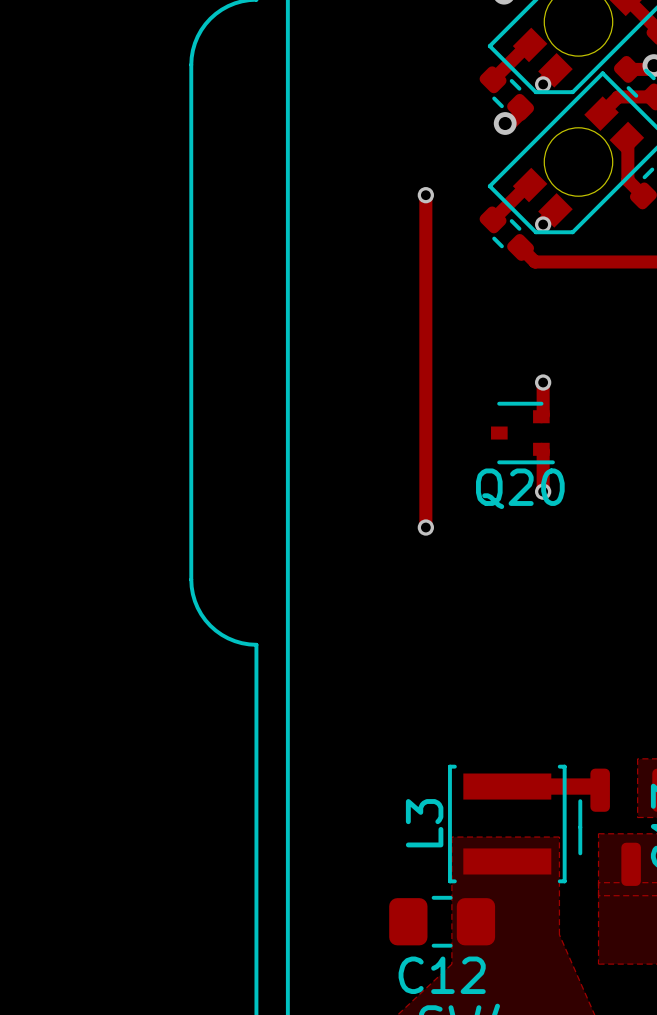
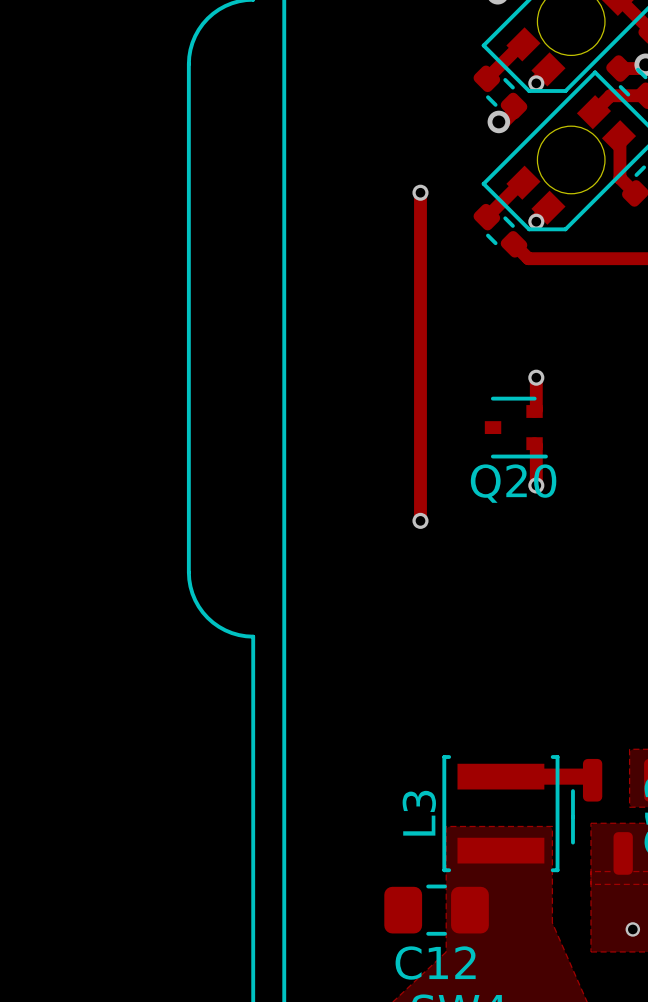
via: none -> (632, 929)

